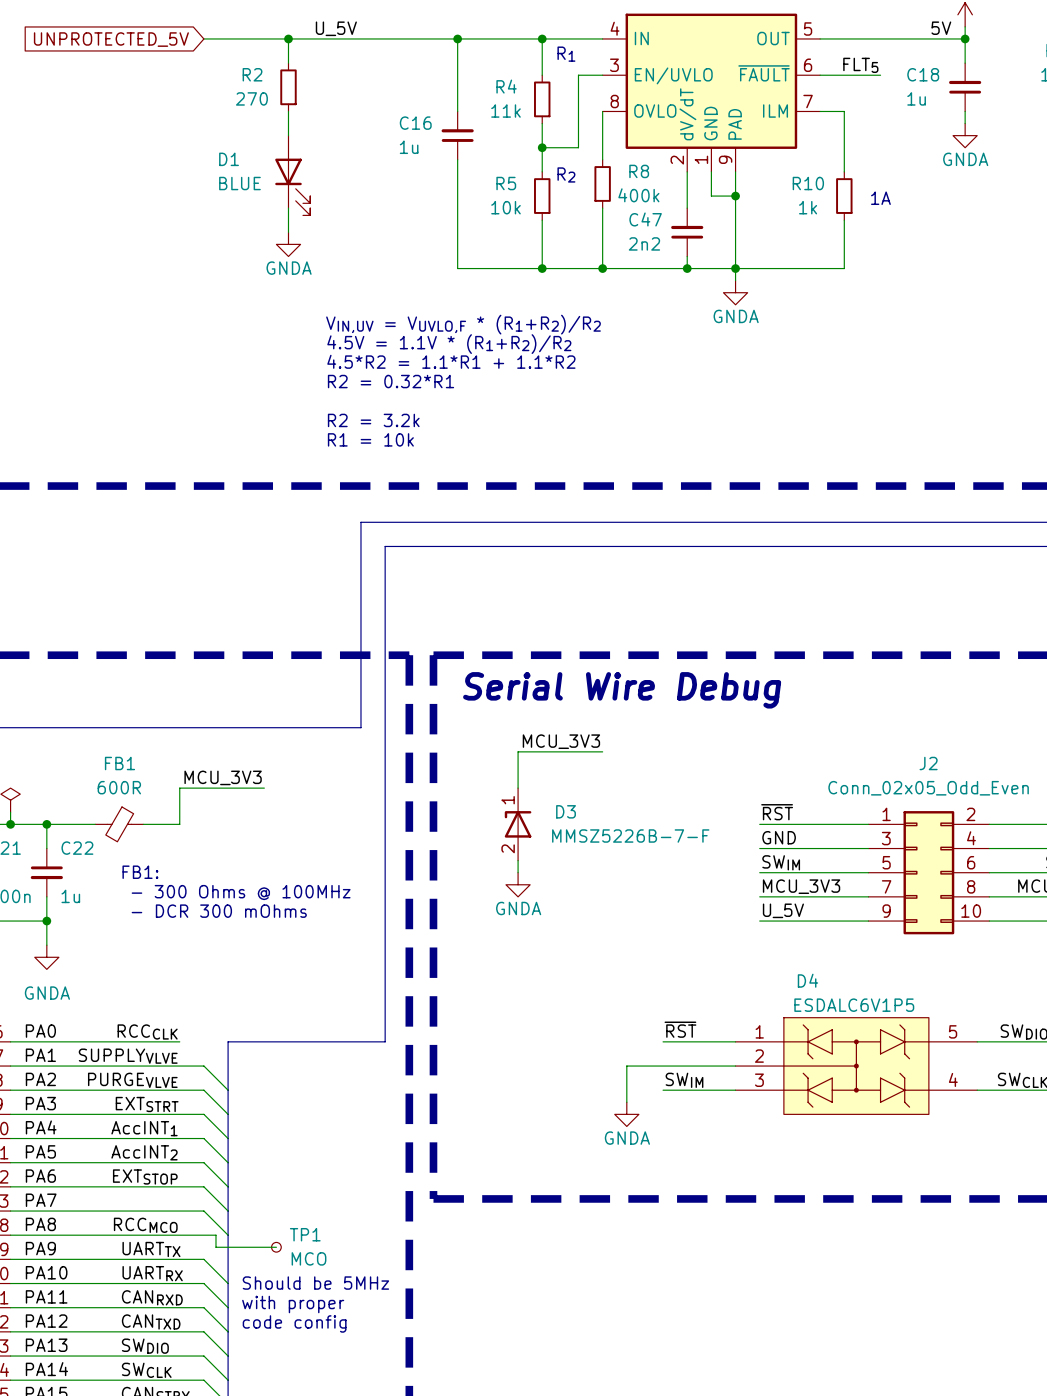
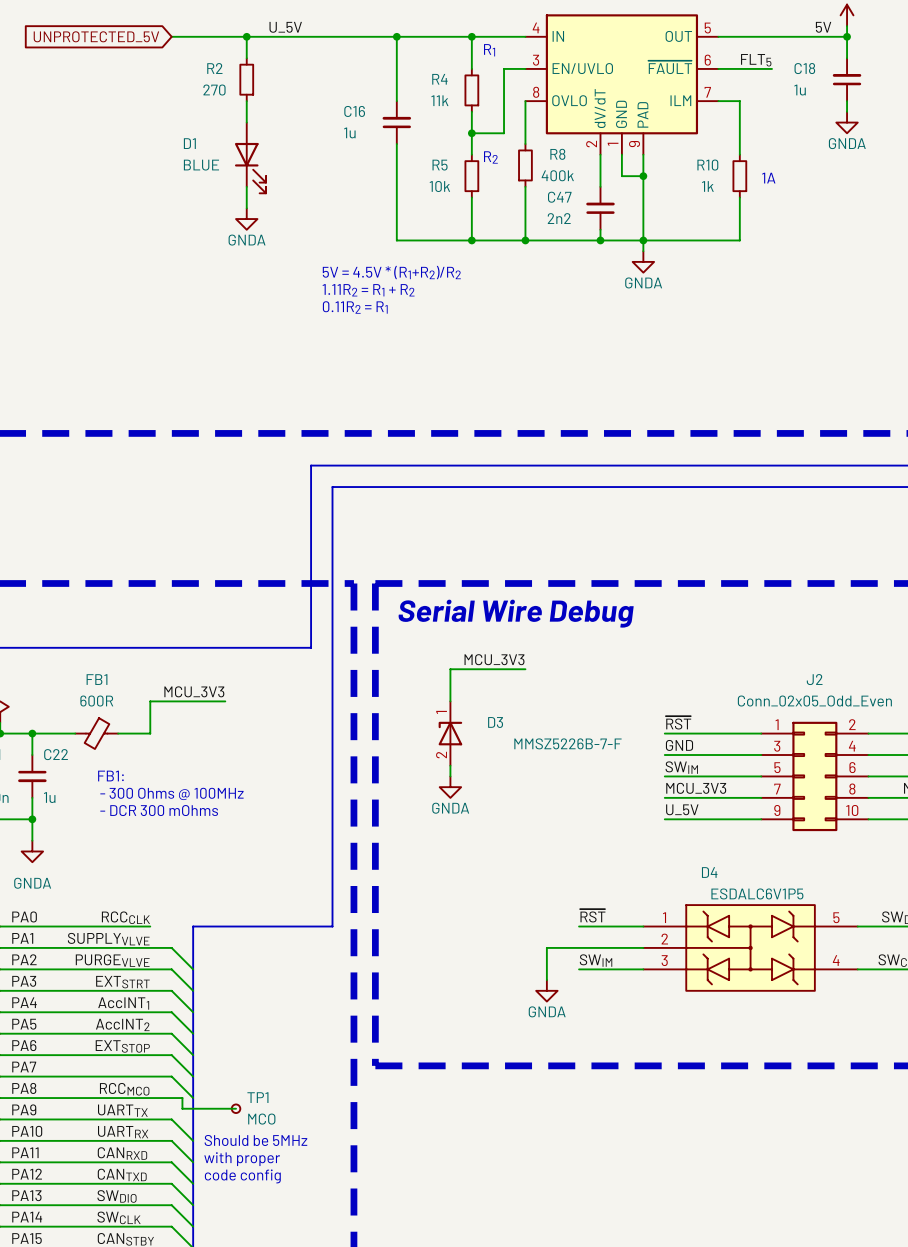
text: none -> 1.11R2 = R1 + R2 (368, 290)
text: VIN,UV = VUVLO,F * (R1+R2)/R2 (463, 324) -> 5V = 4.5V * (R1+R2)/R2 (391, 272)
text: none -> 0.11R2 = R1 (355, 307)
text: 4.5V = 1.1V * (R1+R2)/R2 (449, 344) -> none
text: 4.5*R2 = 1.1*R1 + 1.1*R2 (451, 361) -> none
text: R2 = 0.32*R1 (391, 381) -> none
text: R2 = 3.2k (373, 420) -> none
text: R1 = 10k (370, 439) -> none

